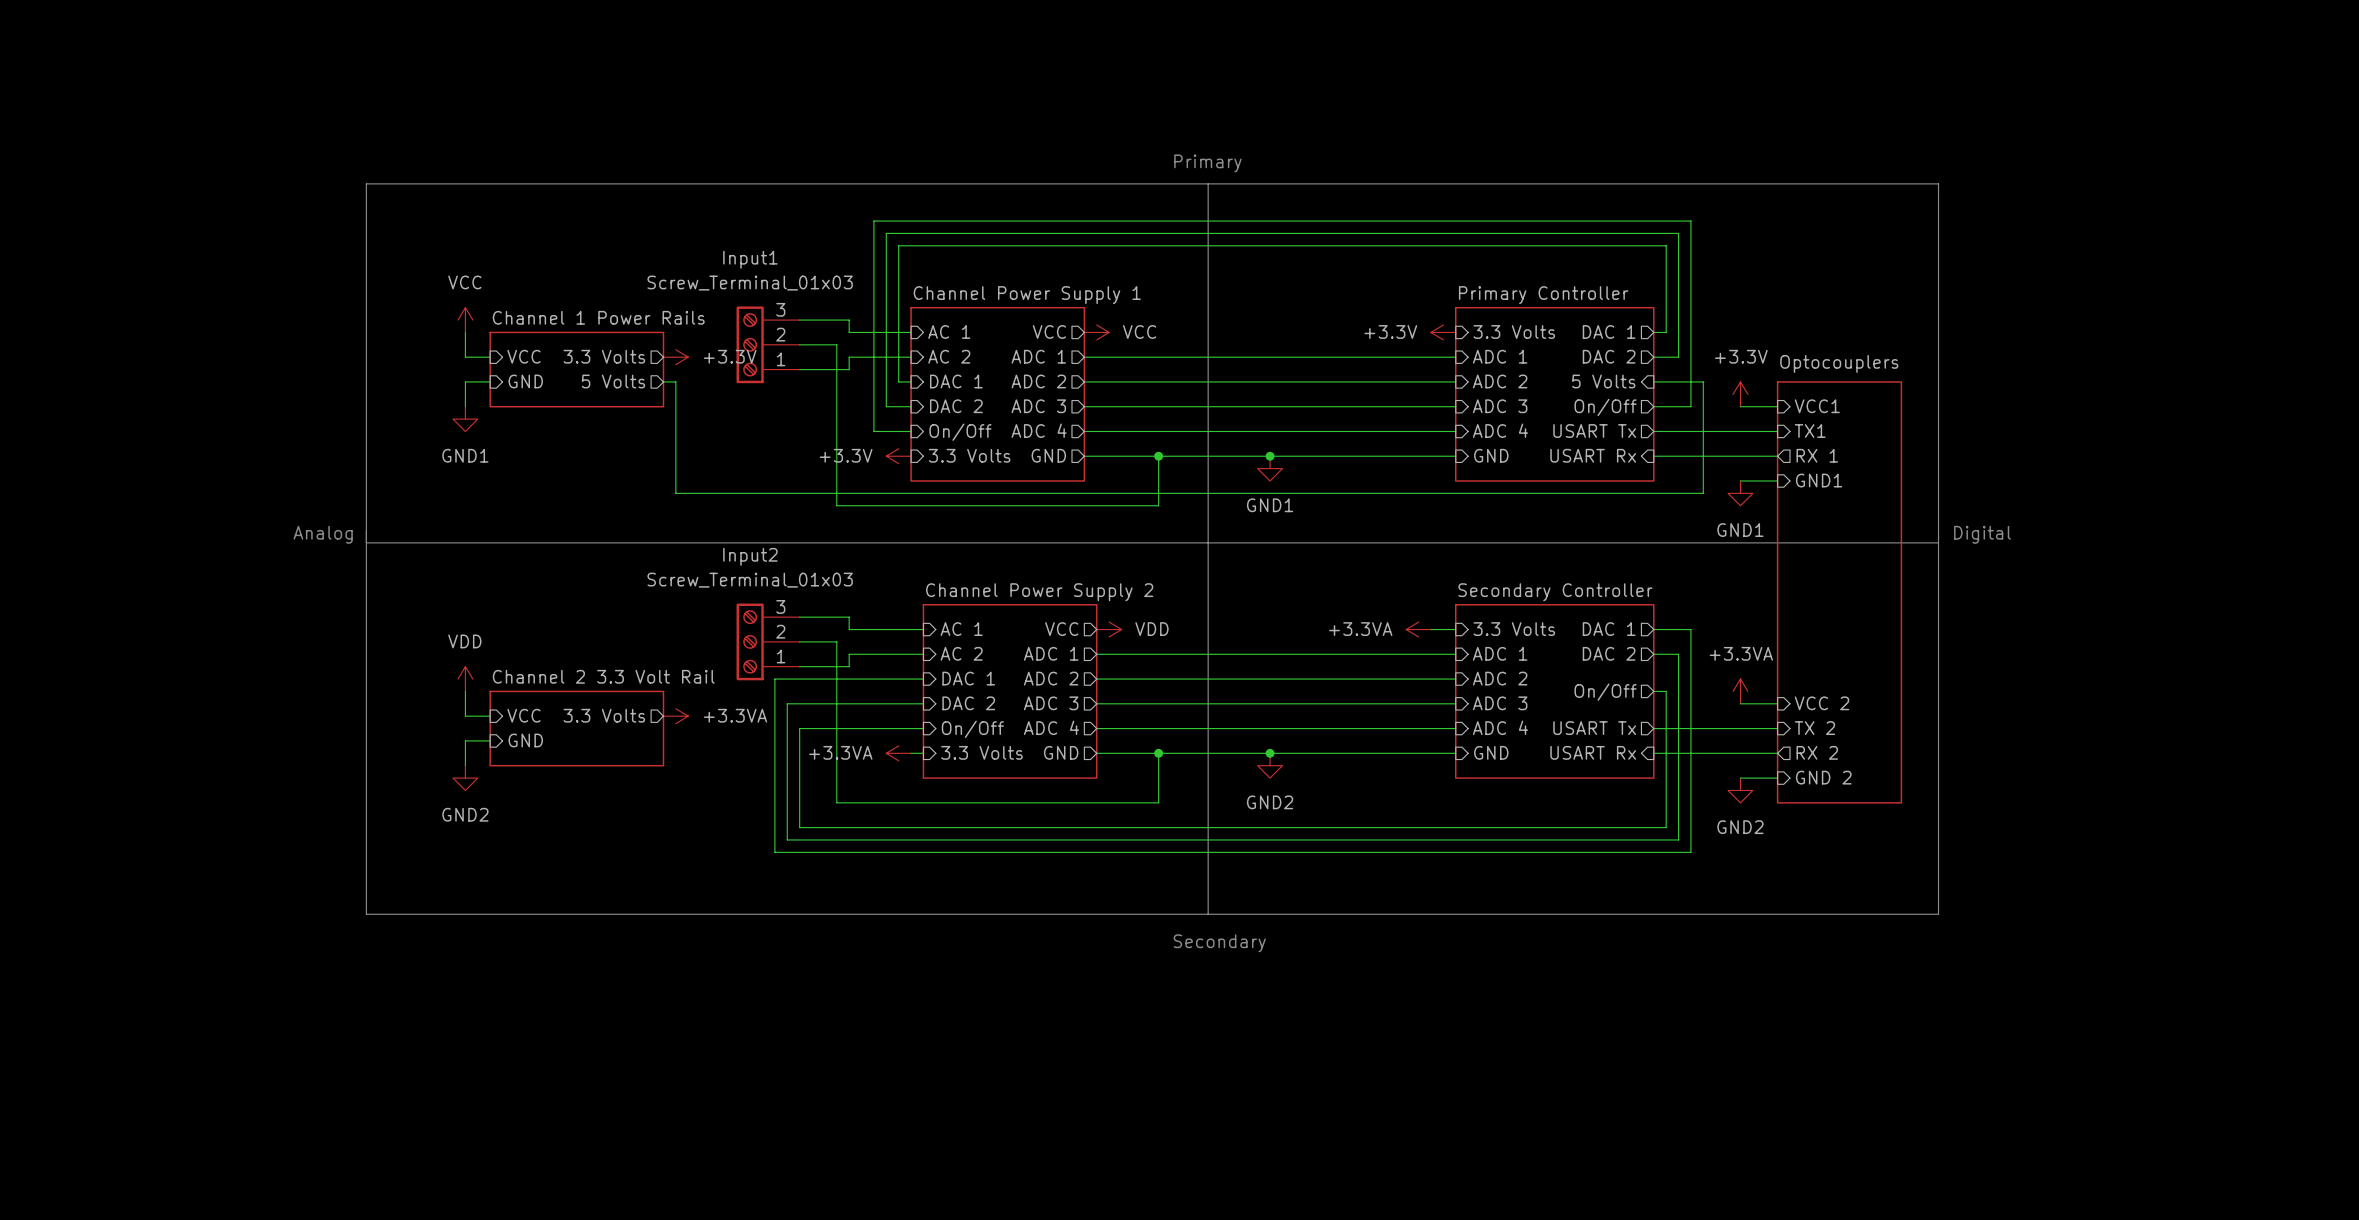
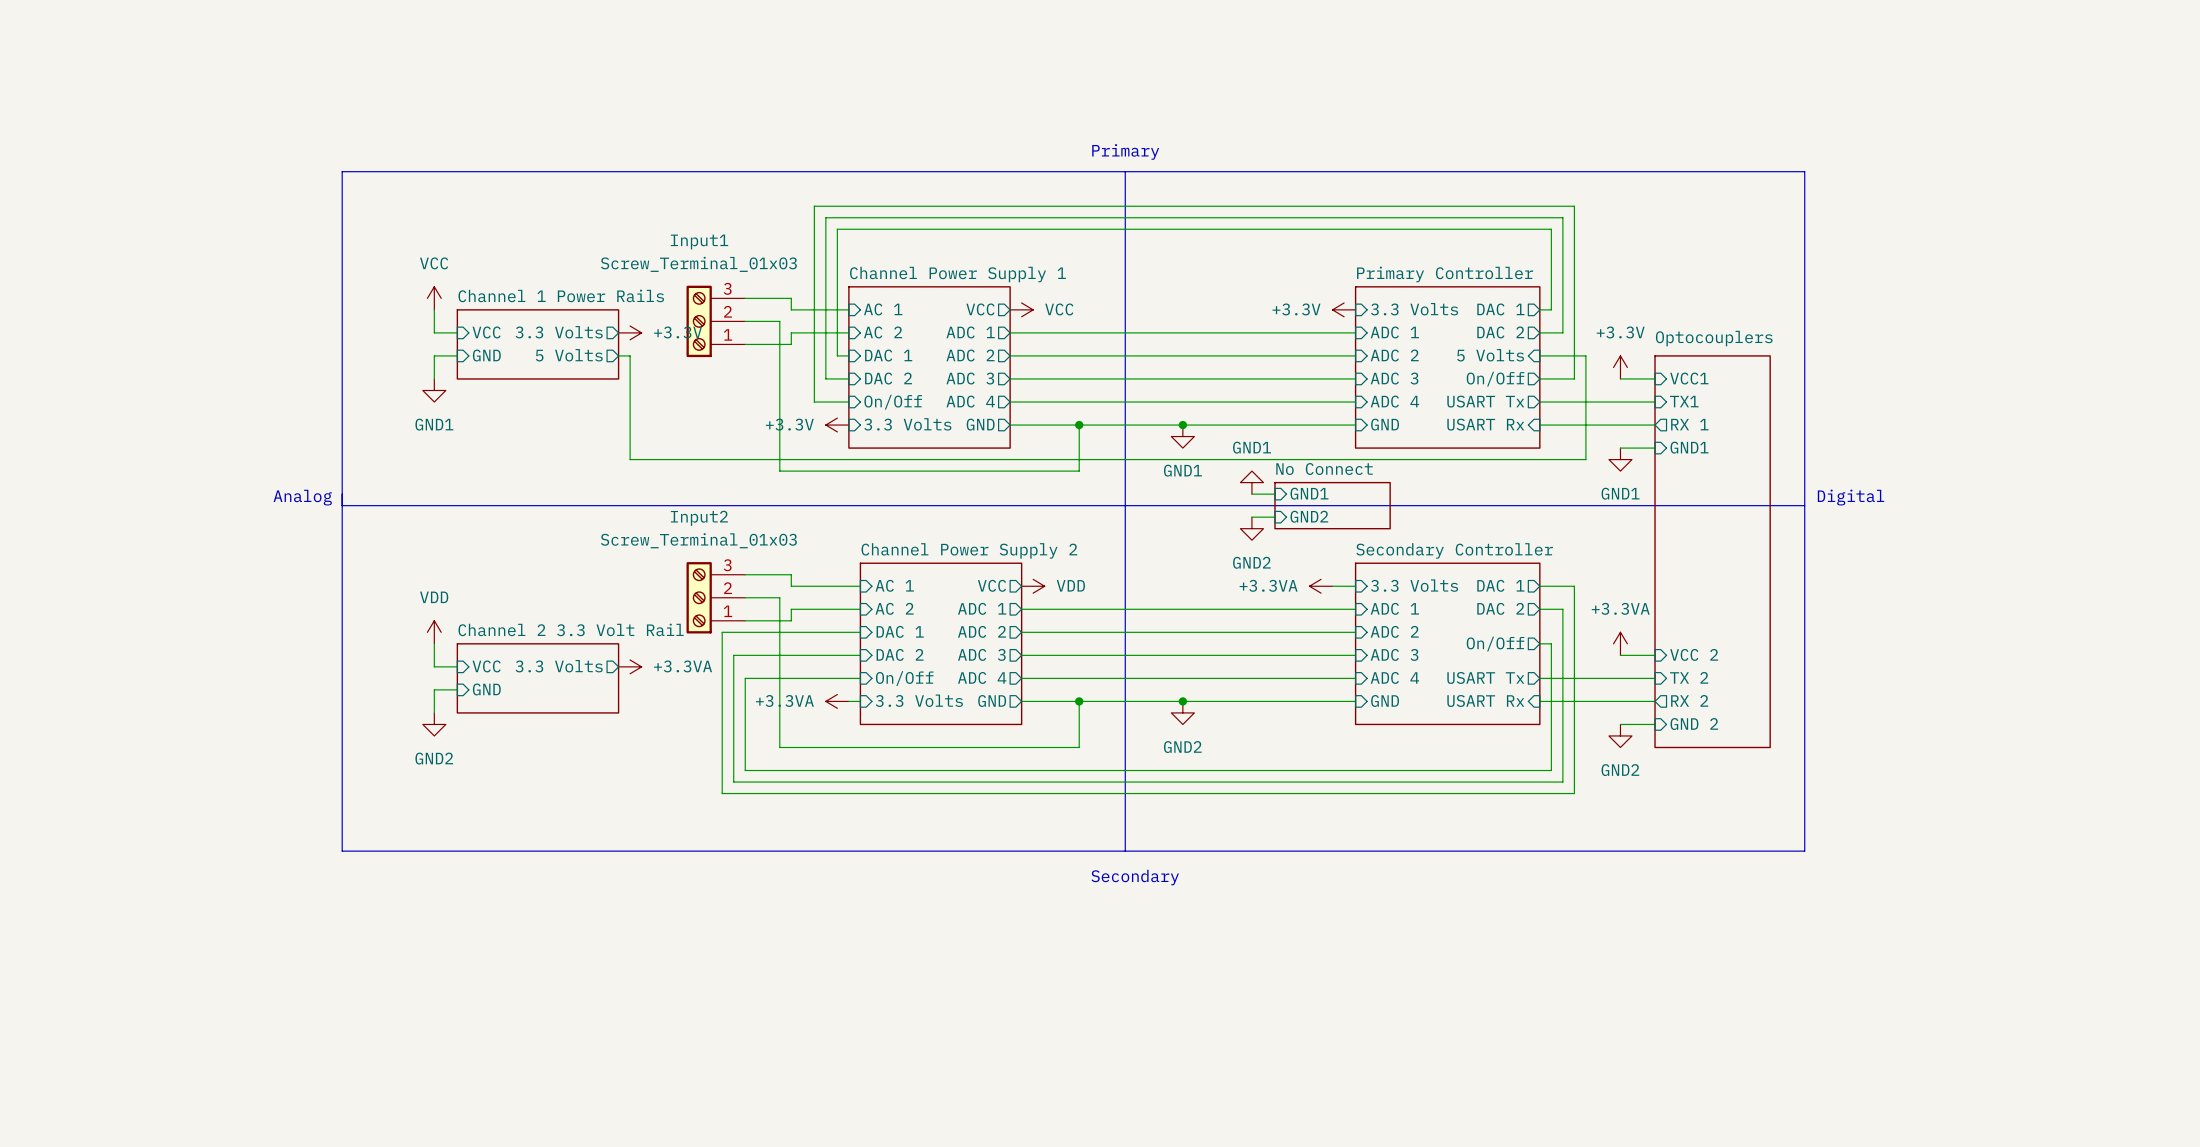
power symbol: none -> GND1 (1251, 482)
wire: none -> (1251, 494) (1274, 494)
sheet pin: none -> GND1 (1309, 493)
sheet No Connect: none -> (1332, 505)
sheet pin: none -> GND2 (1309, 516)
wire: none -> (1251, 517) (1274, 517)
power symbol: none -> GND2 (1251, 528)

